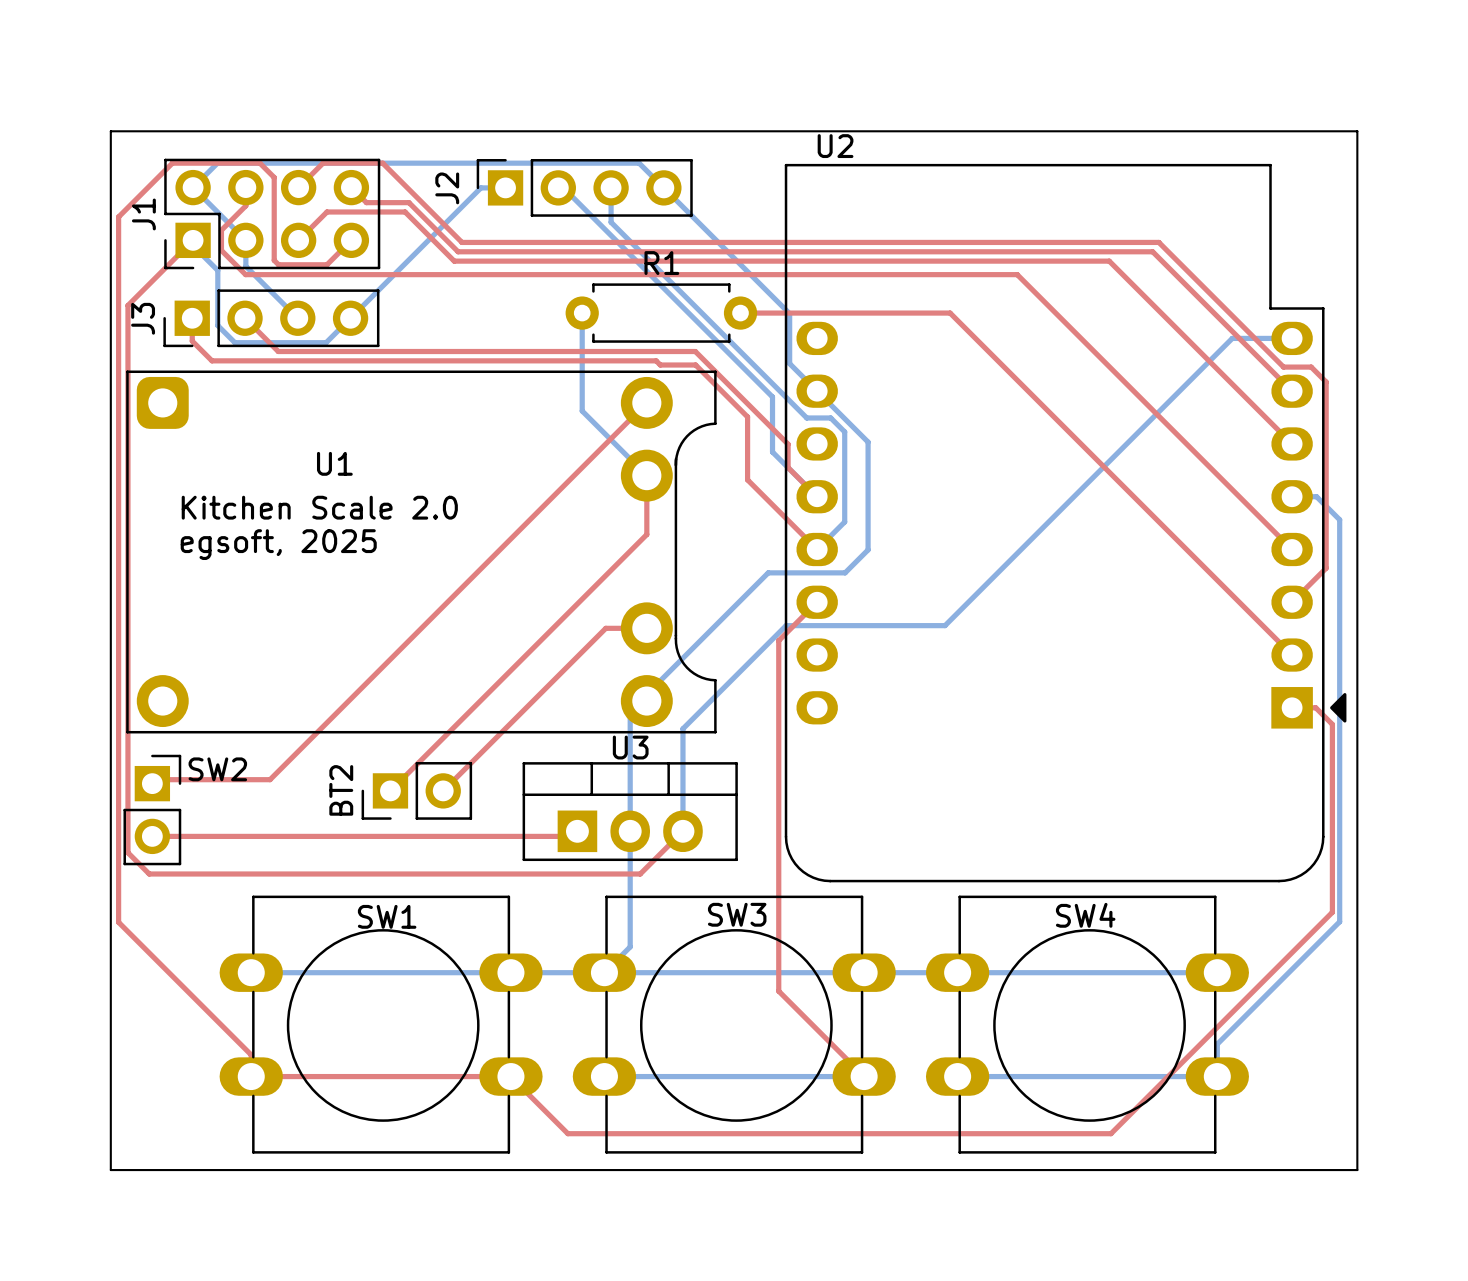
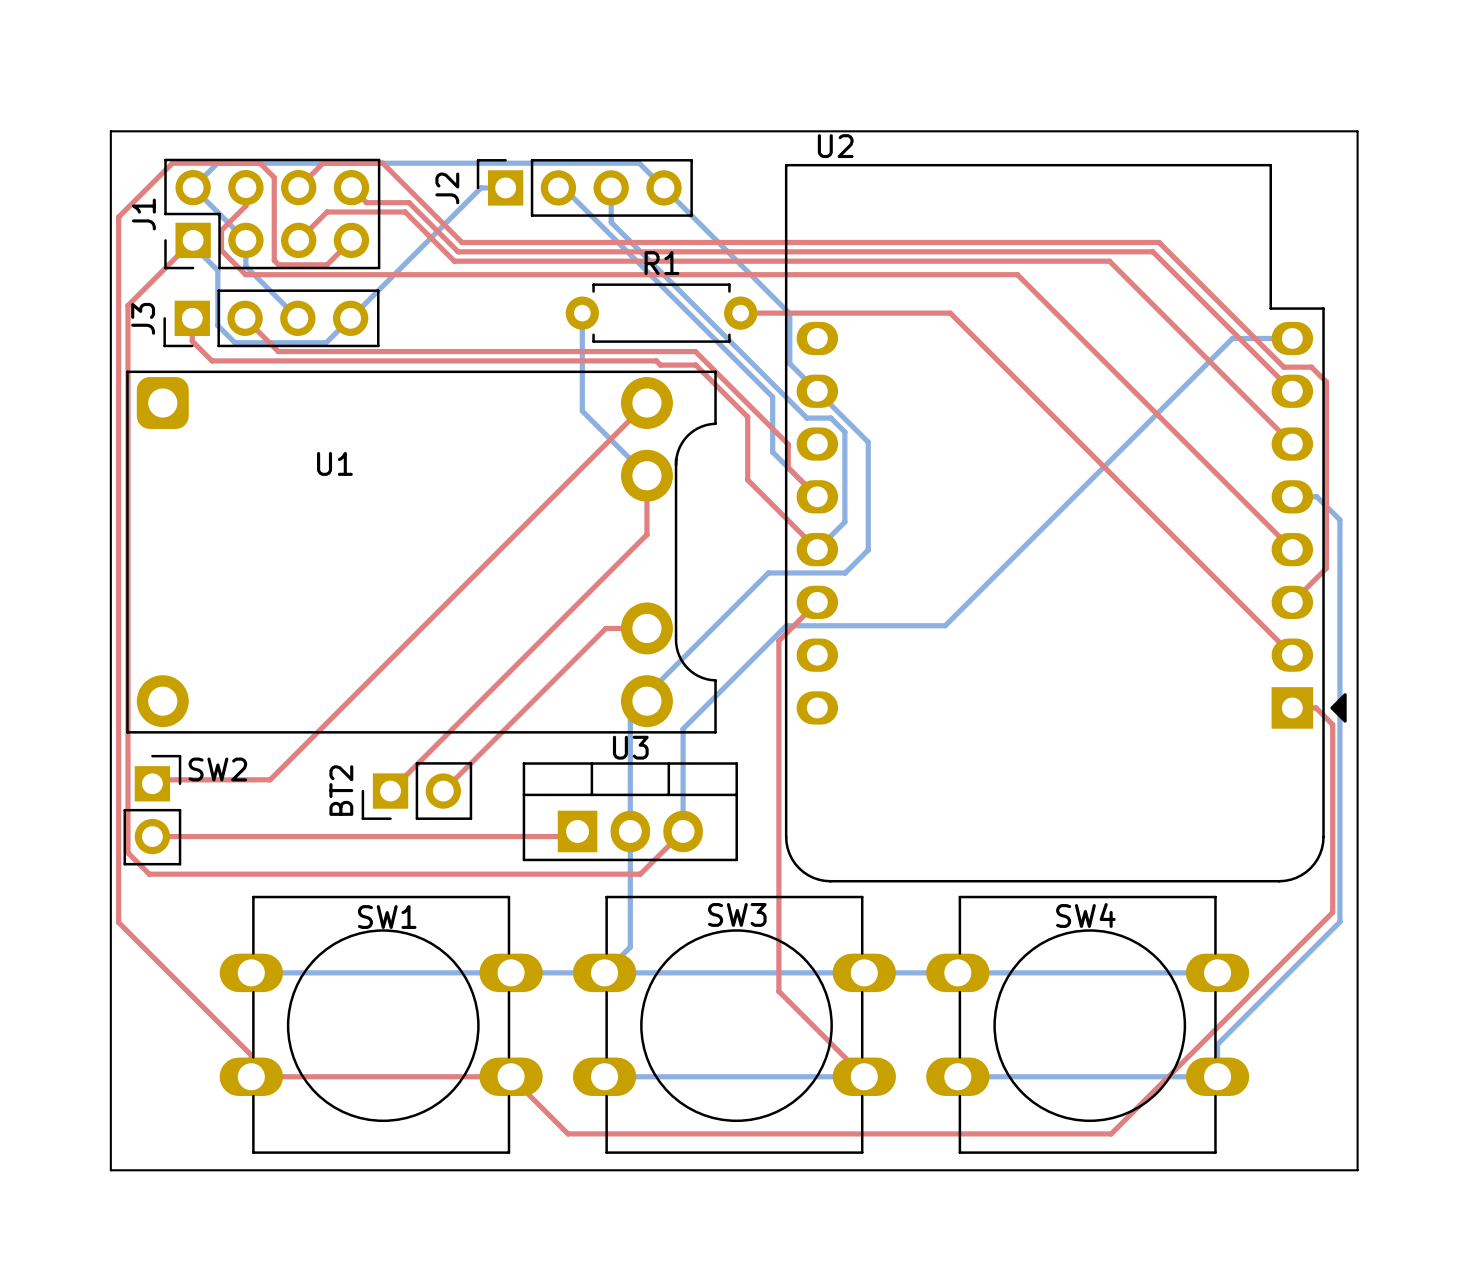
text: Kitchen Scale 2.0 (319, 507) -> none
text: egsoft, 2025 (278, 544) -> none

